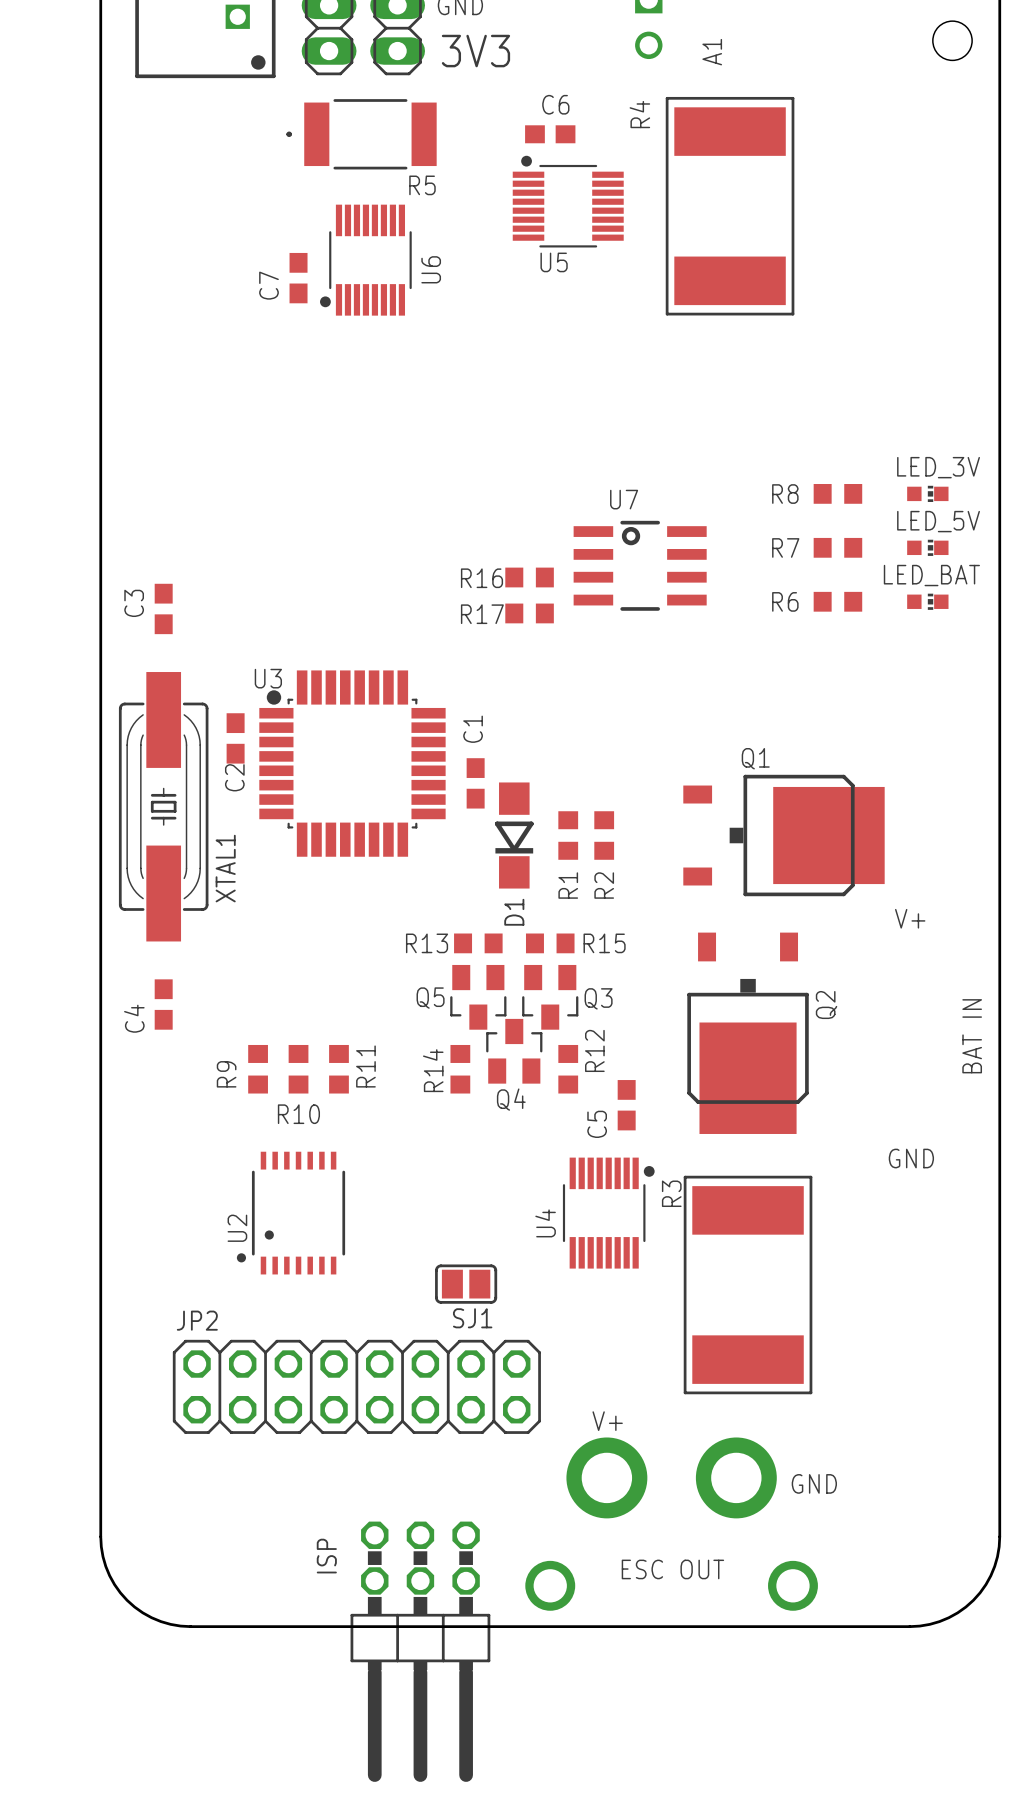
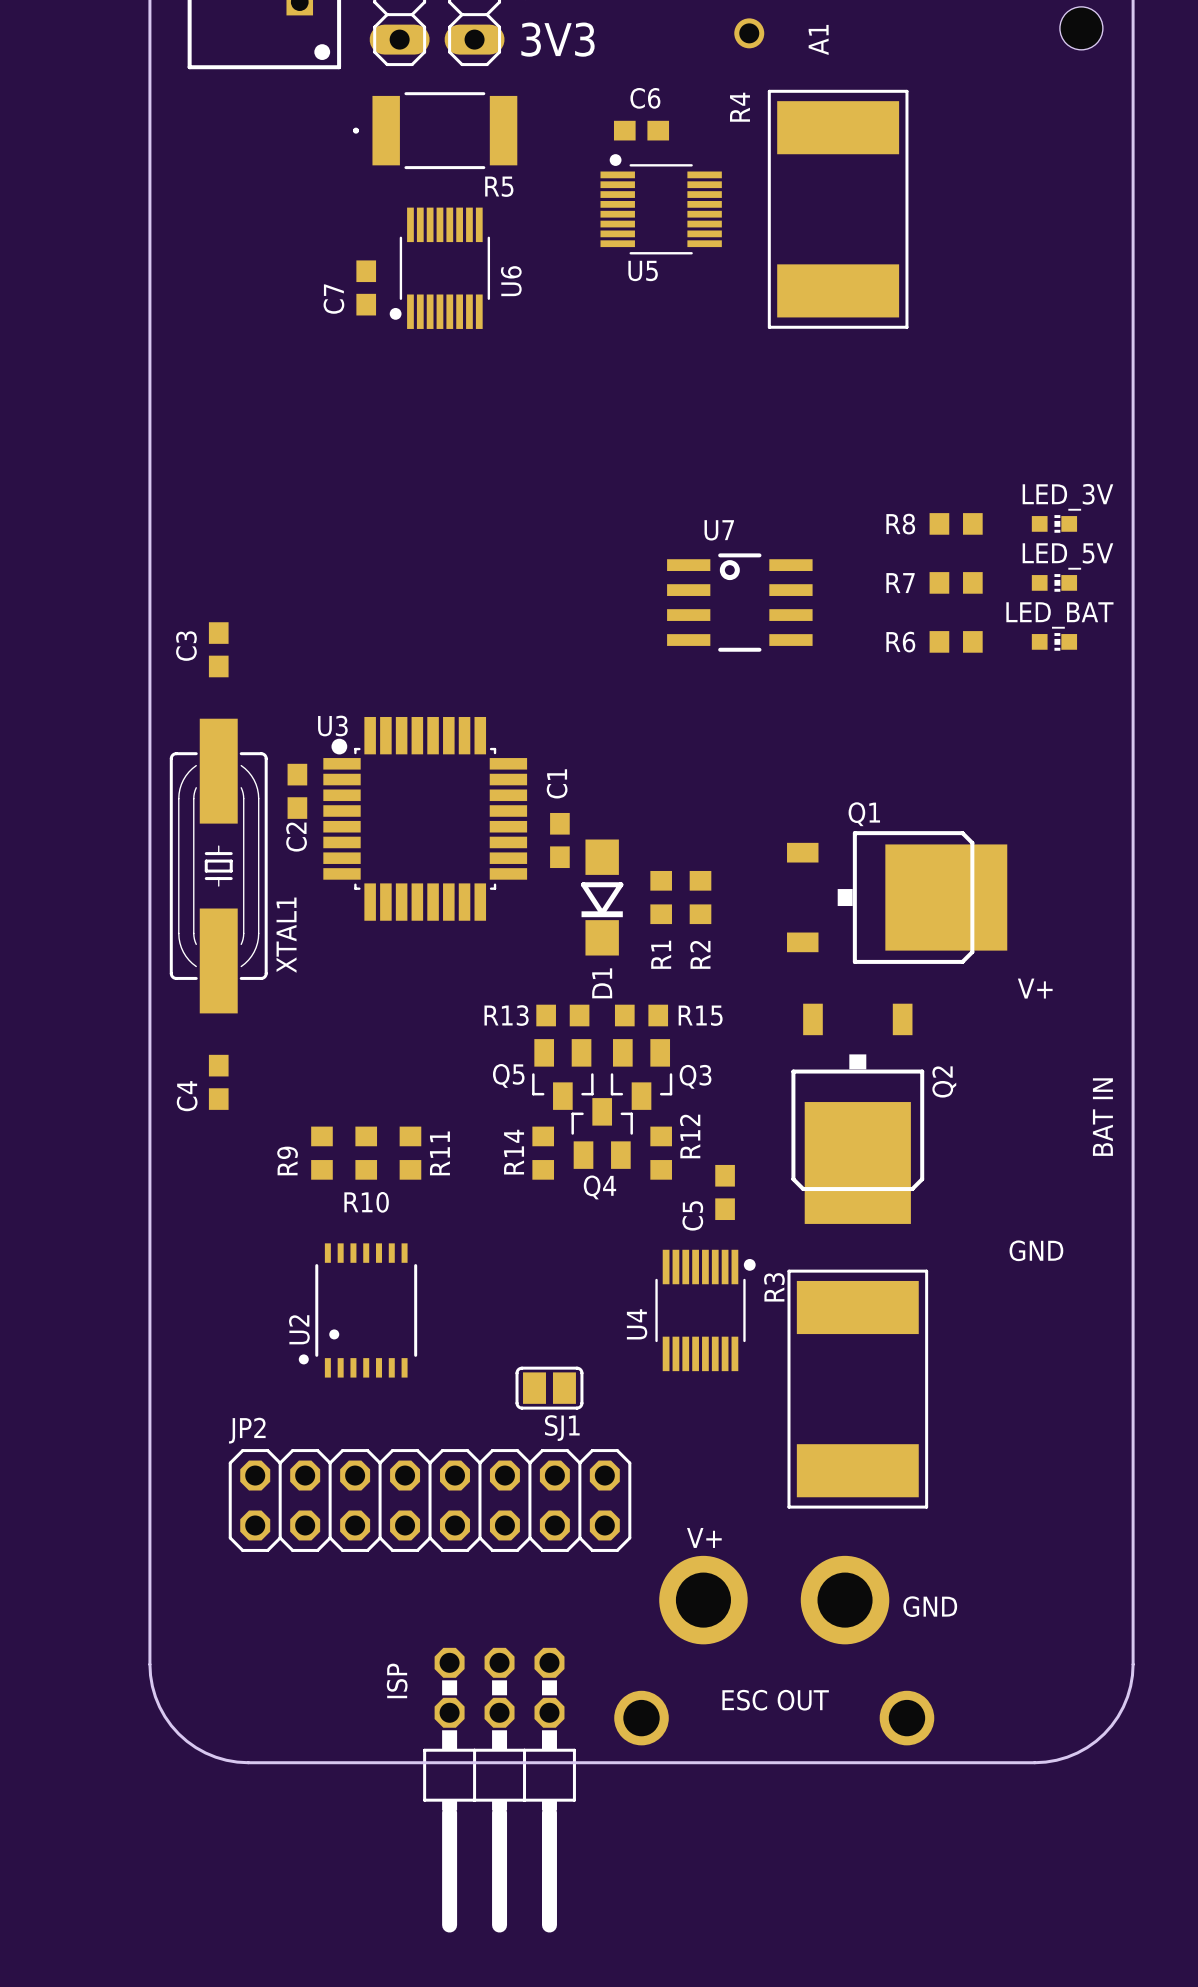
R16: (529, 577) -> none
R17: (529, 613) -> none

